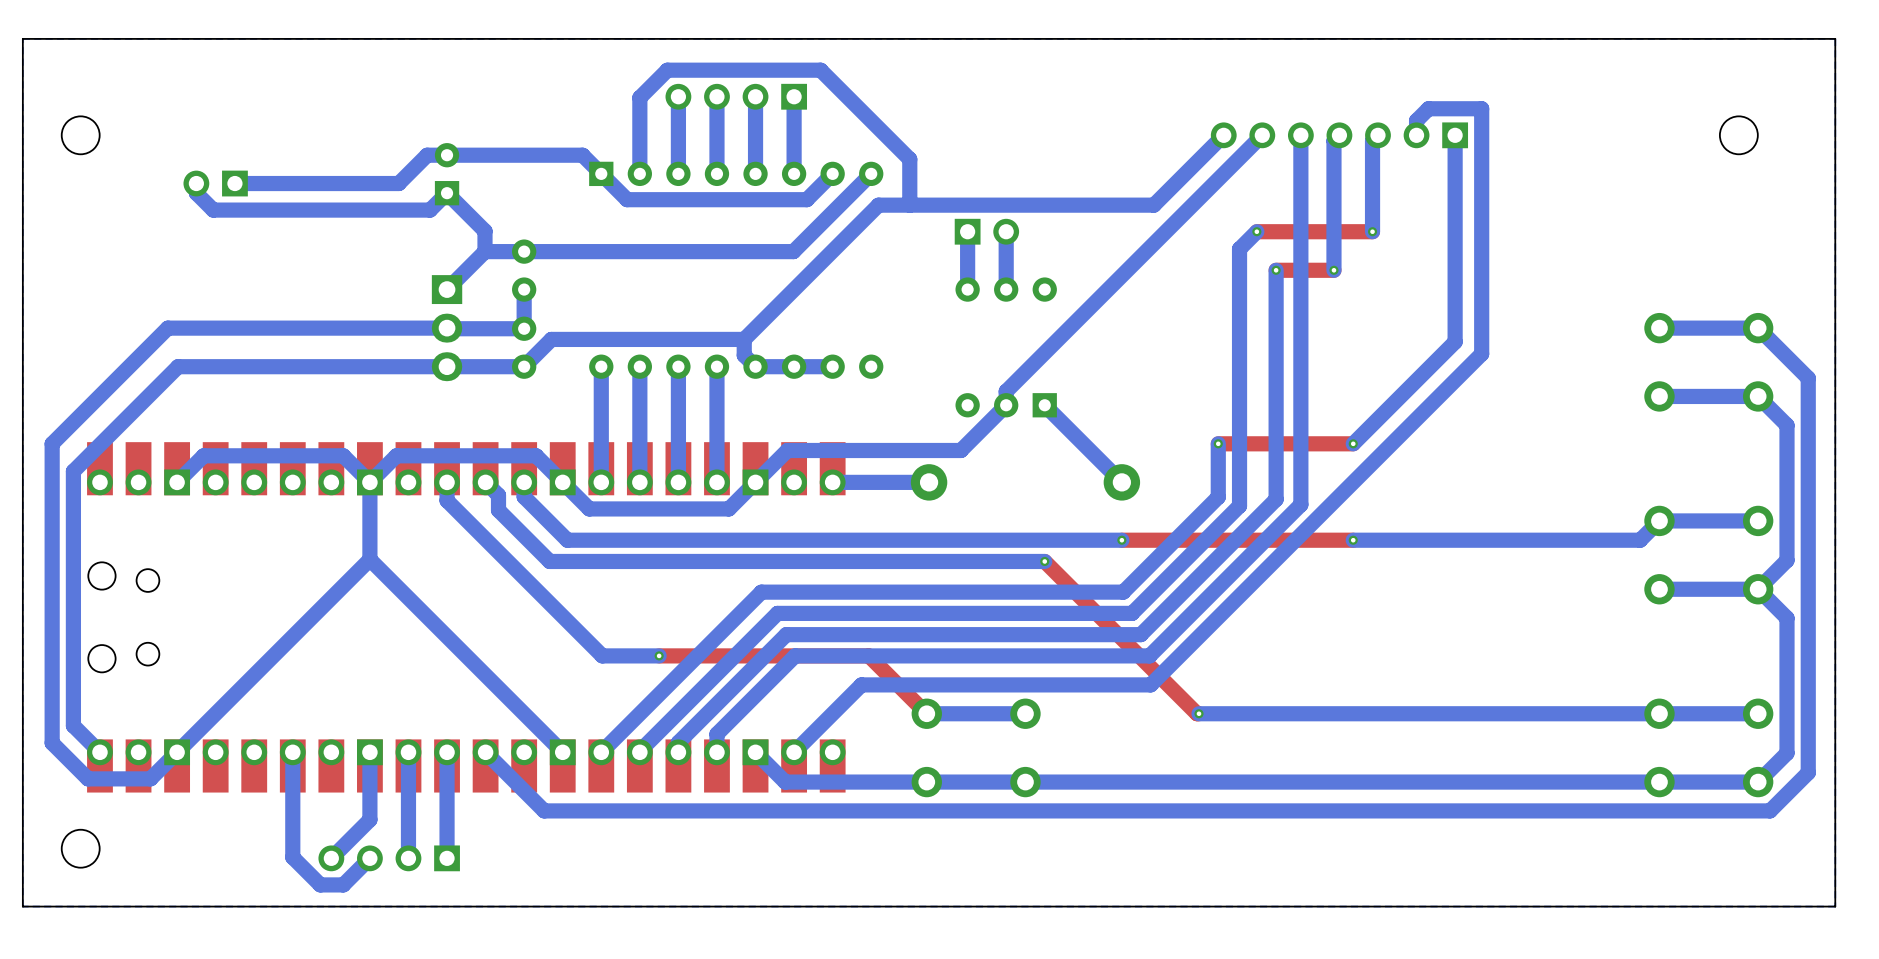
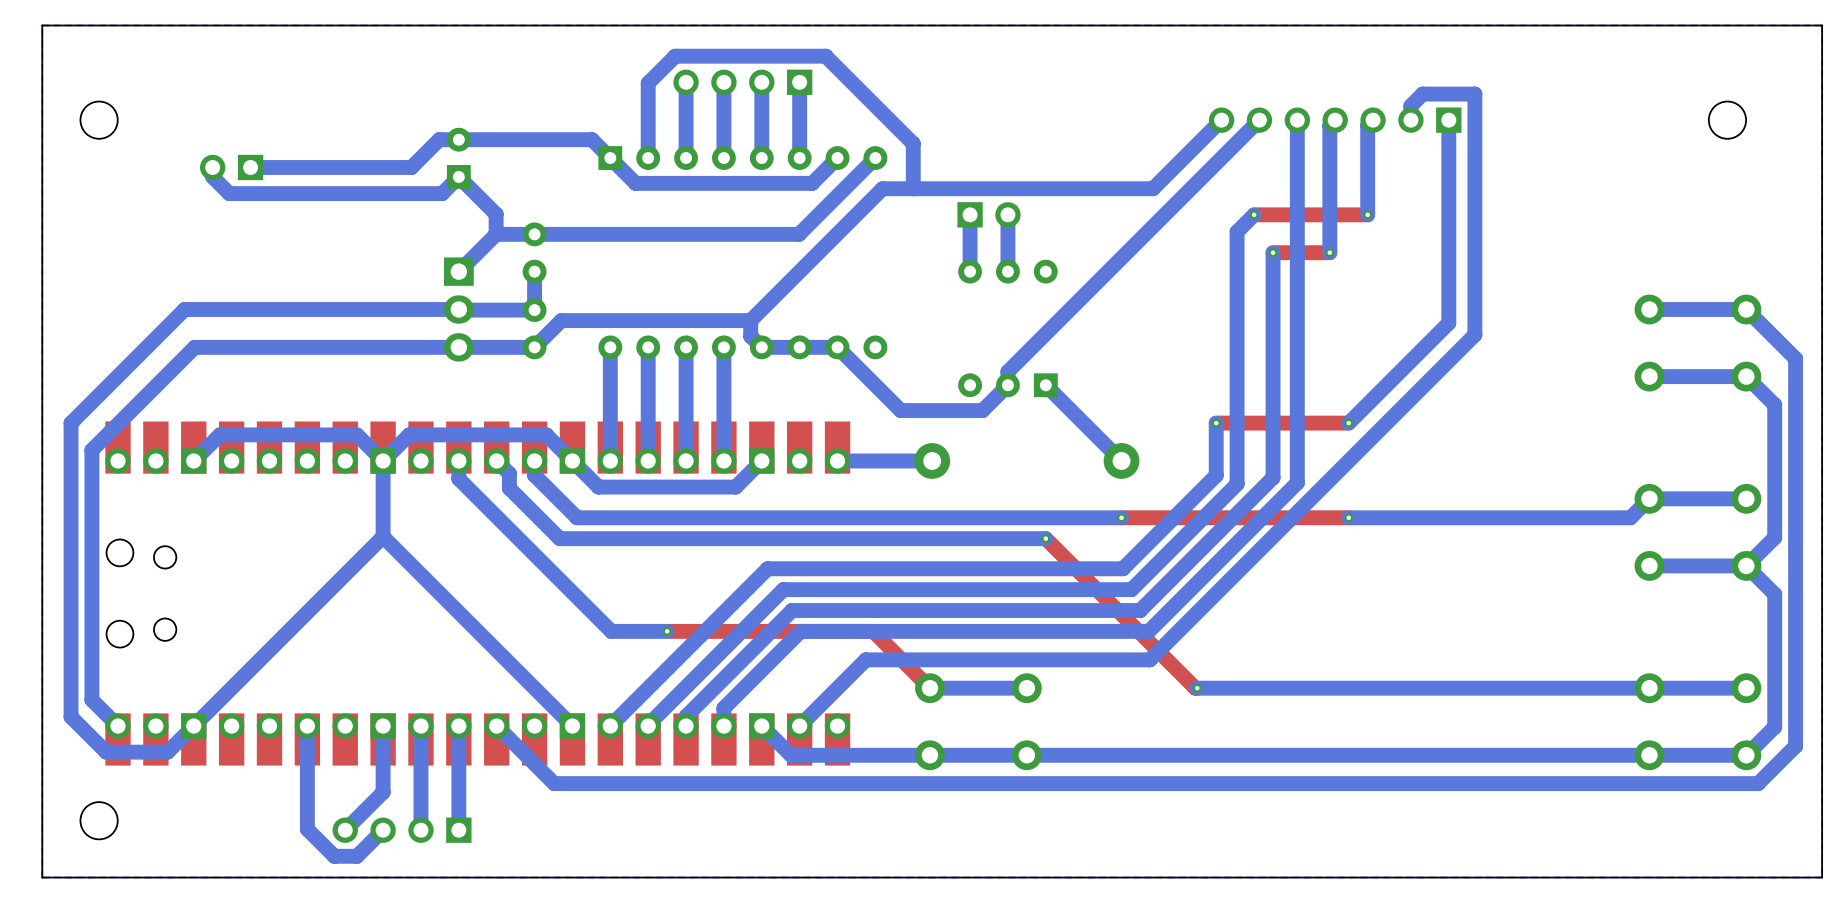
bottom track: (980, 431) (960, 450) (787, 450) (755, 482) -> (982, 410) (900, 410) (837, 347)

